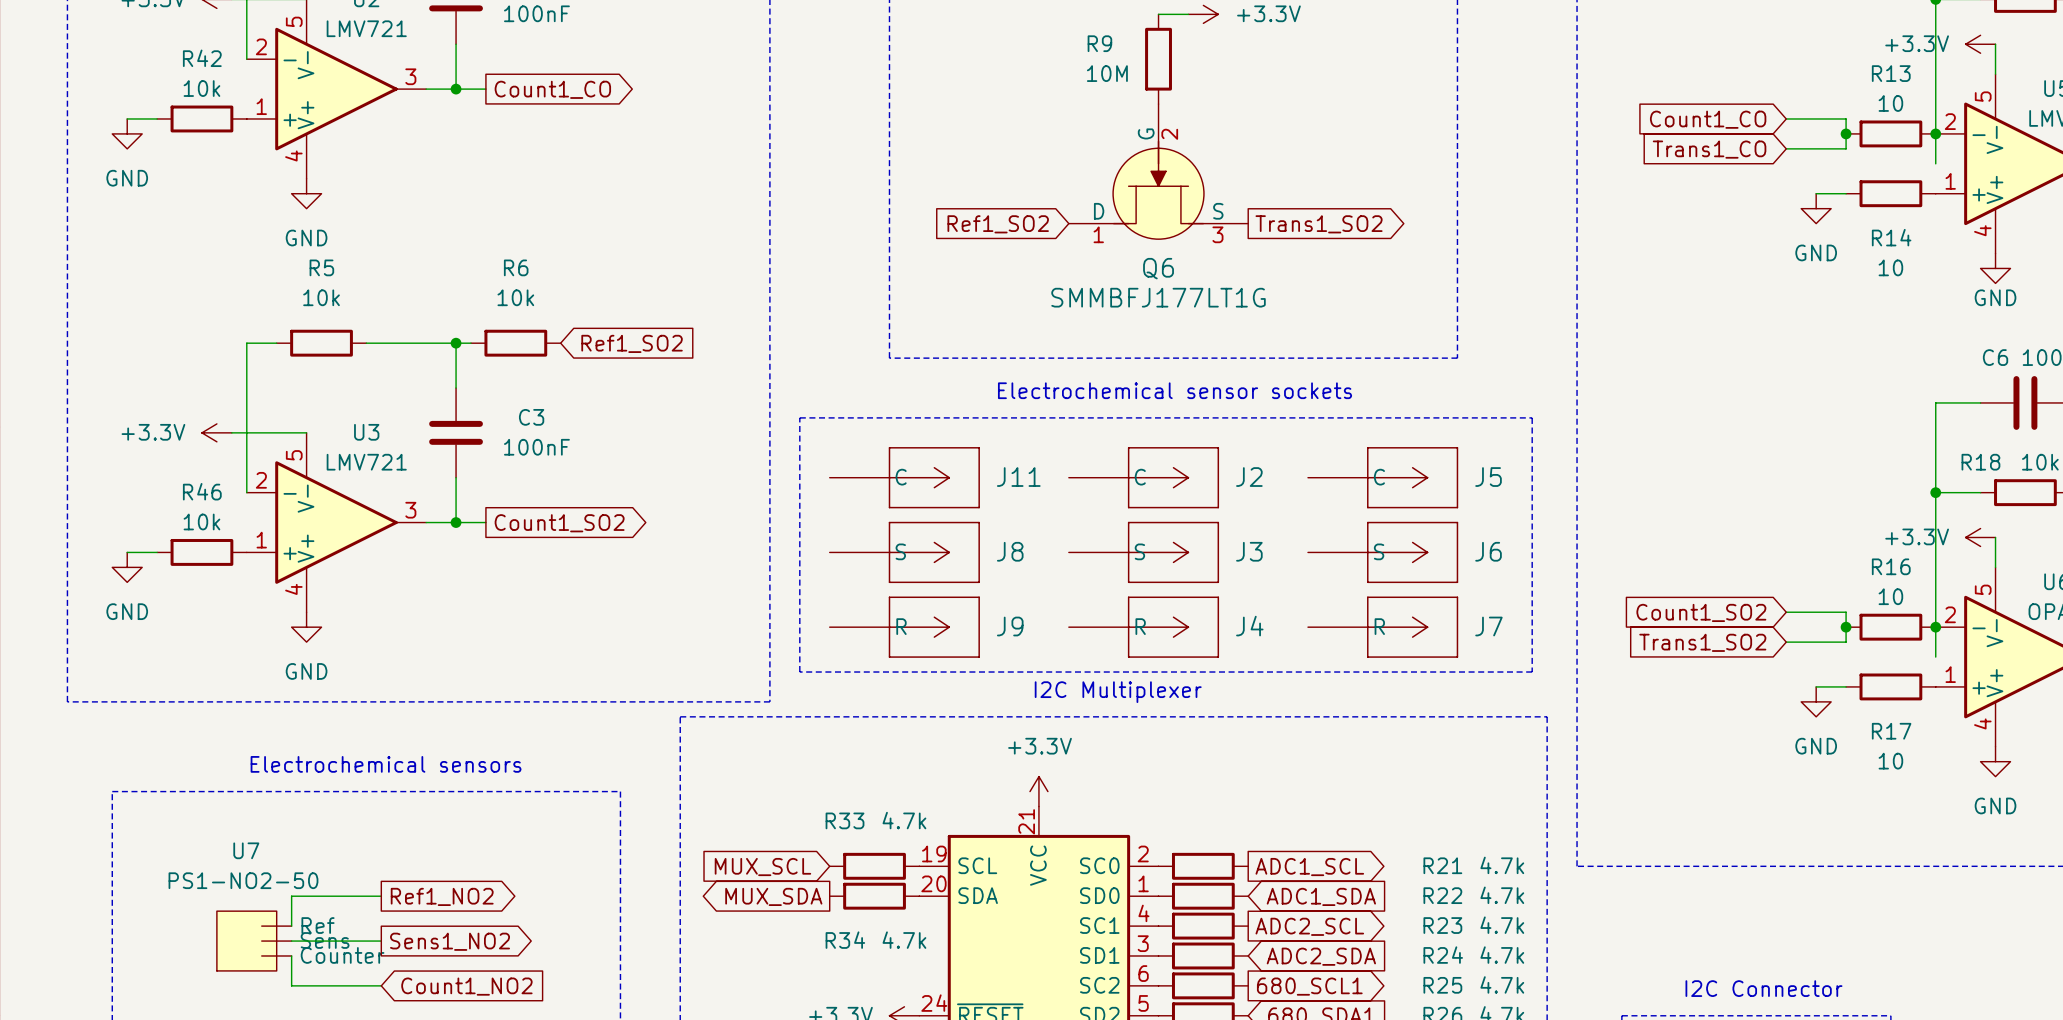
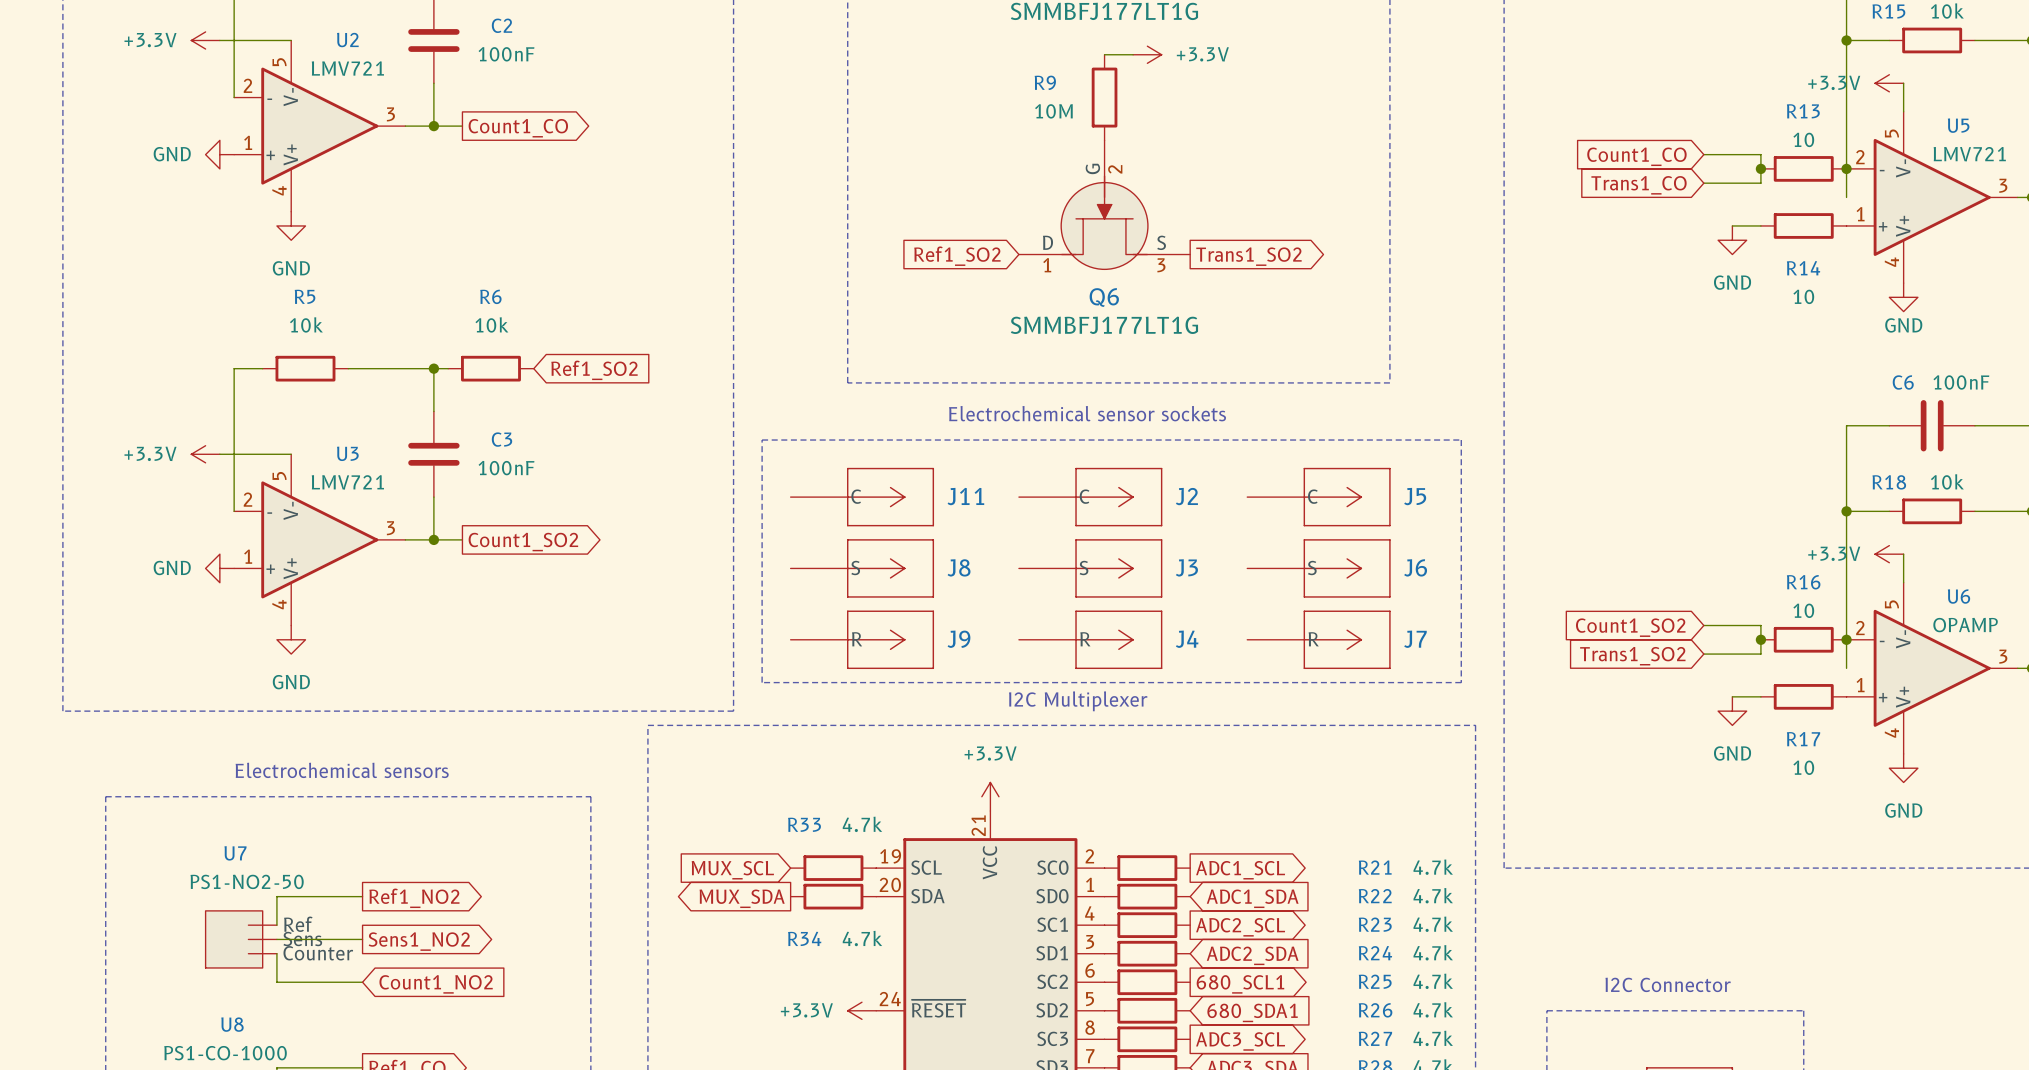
wire: (127, 118) (157, 118) -> none
R42: 10k (201, 118) -> none
power symbol rotation: 0° (127, 133) -> 90° clockwise (219, 154)
power symbol position: GND (127, 133) -> GND (219, 154)
wire: (127, 552) (157, 552) -> none
R46: 10k (201, 552) -> none
power symbol rotation: 0° (127, 567) -> 90° clockwise (219, 568)
power symbol position: GND (127, 567) -> GND (219, 568)

